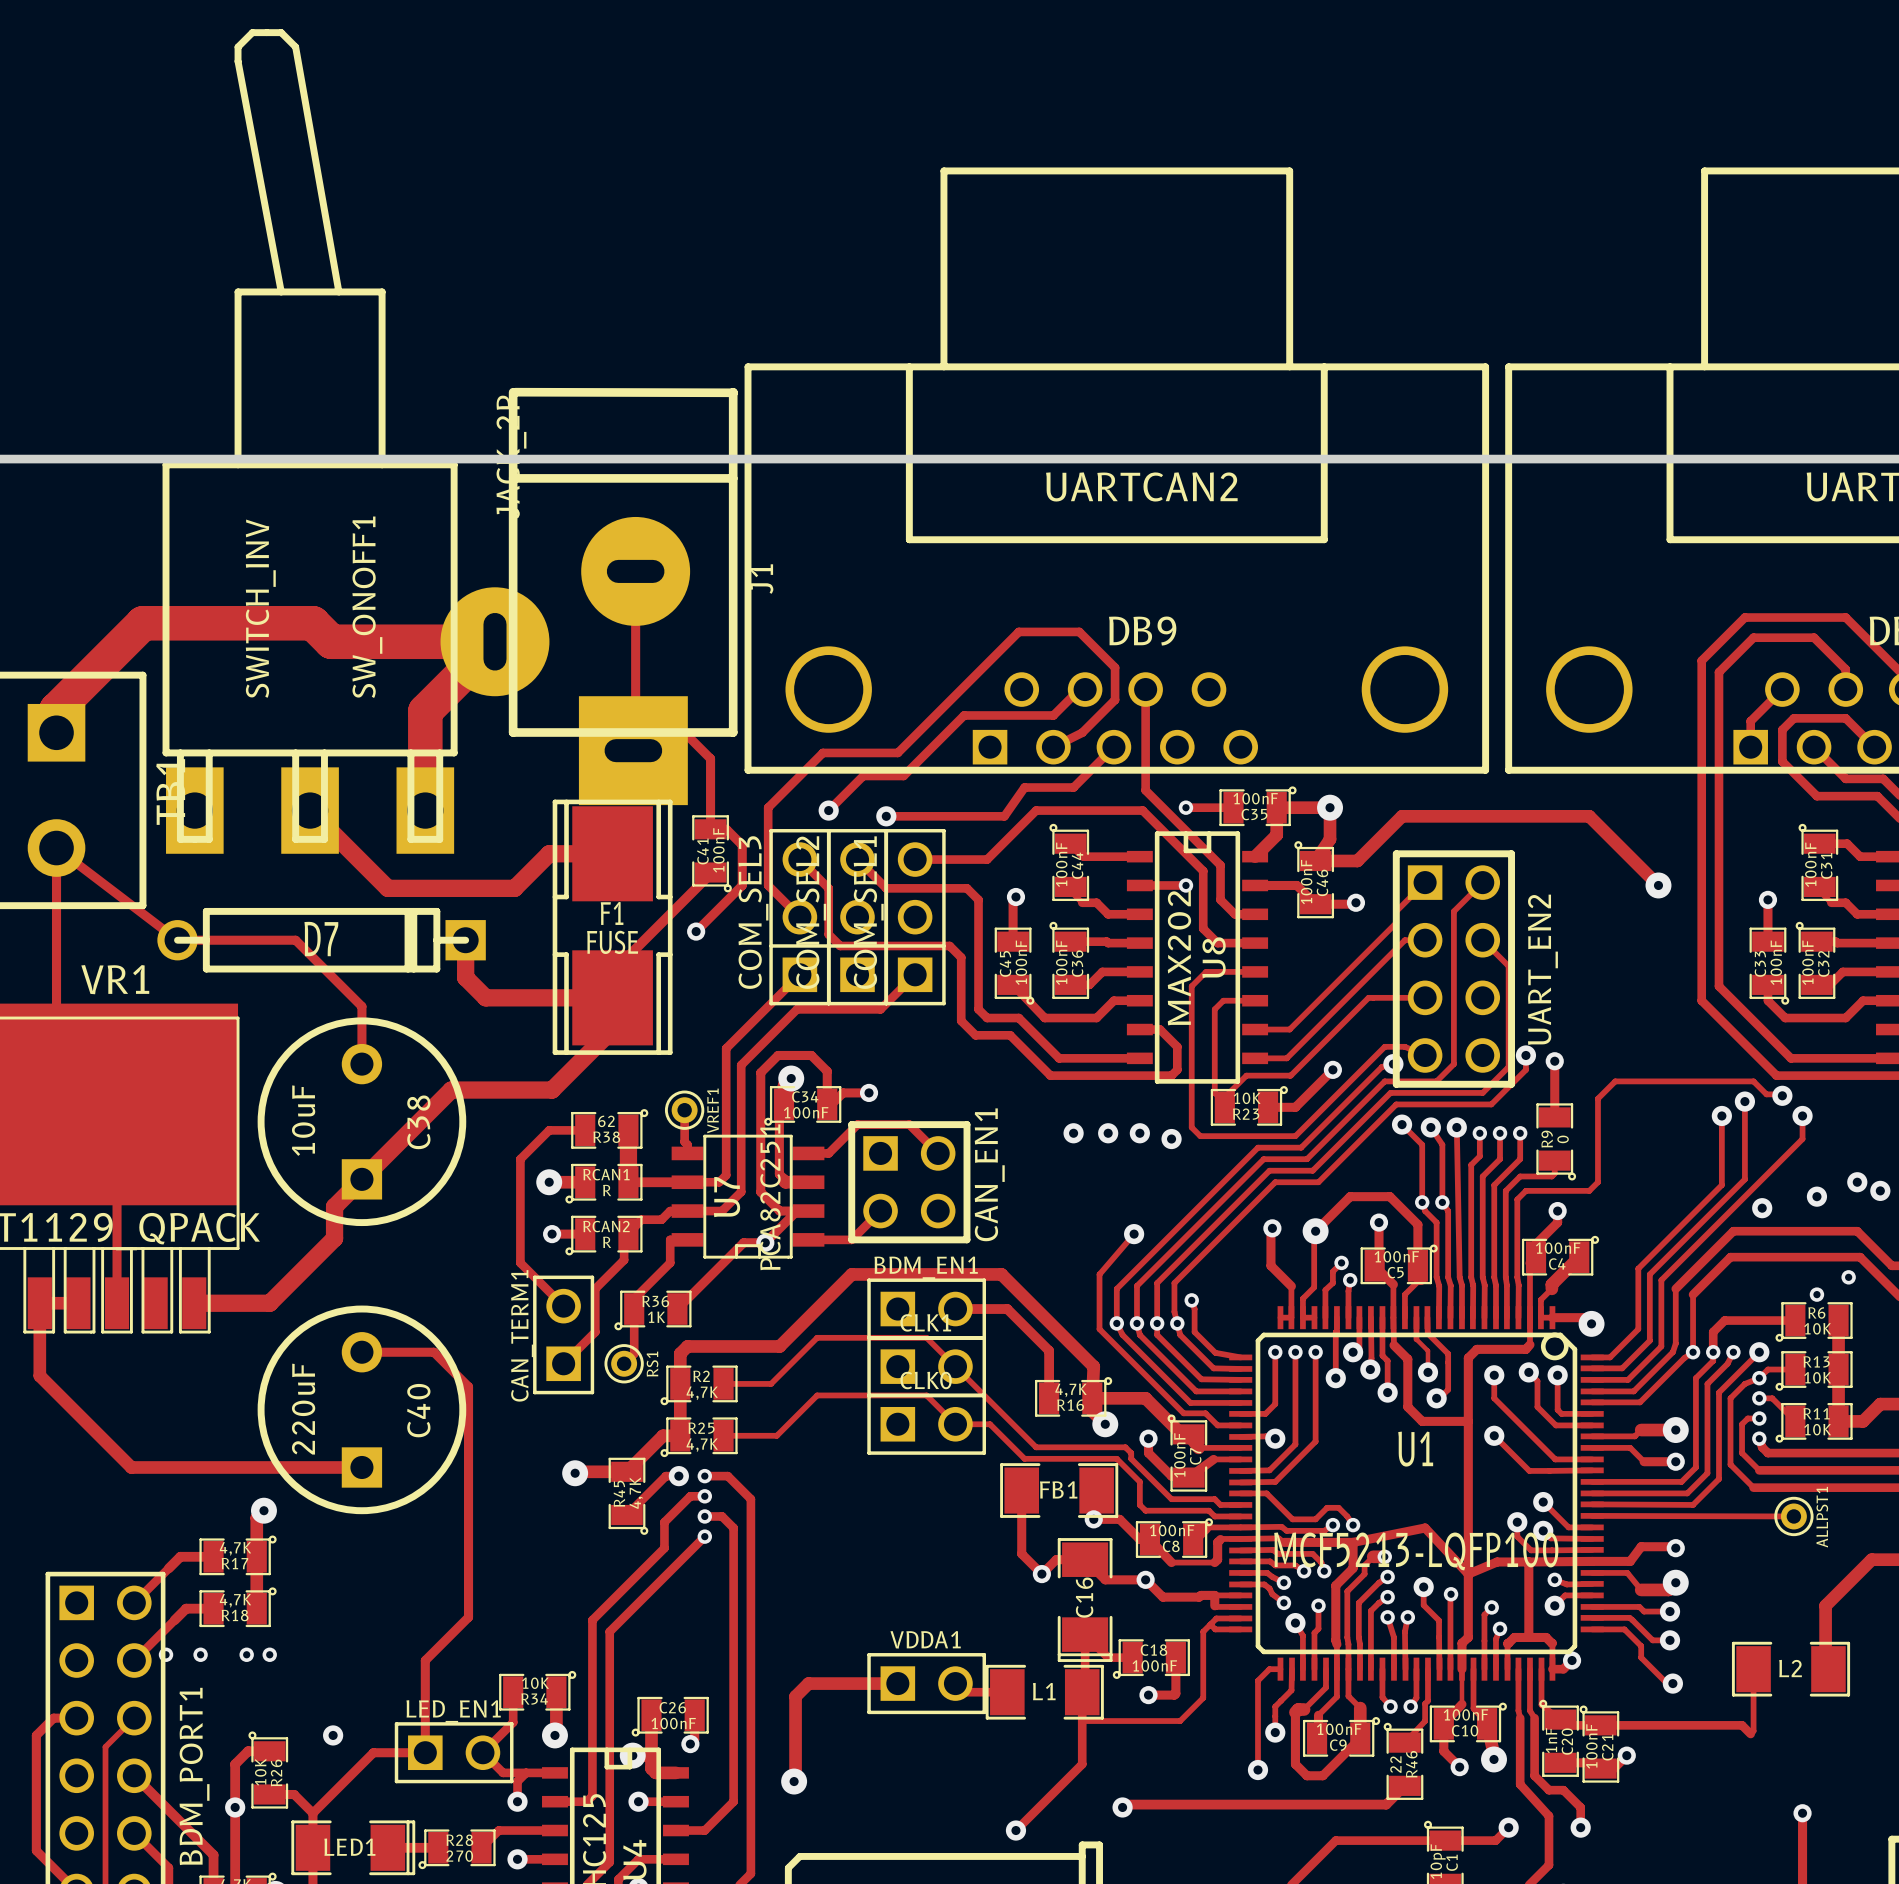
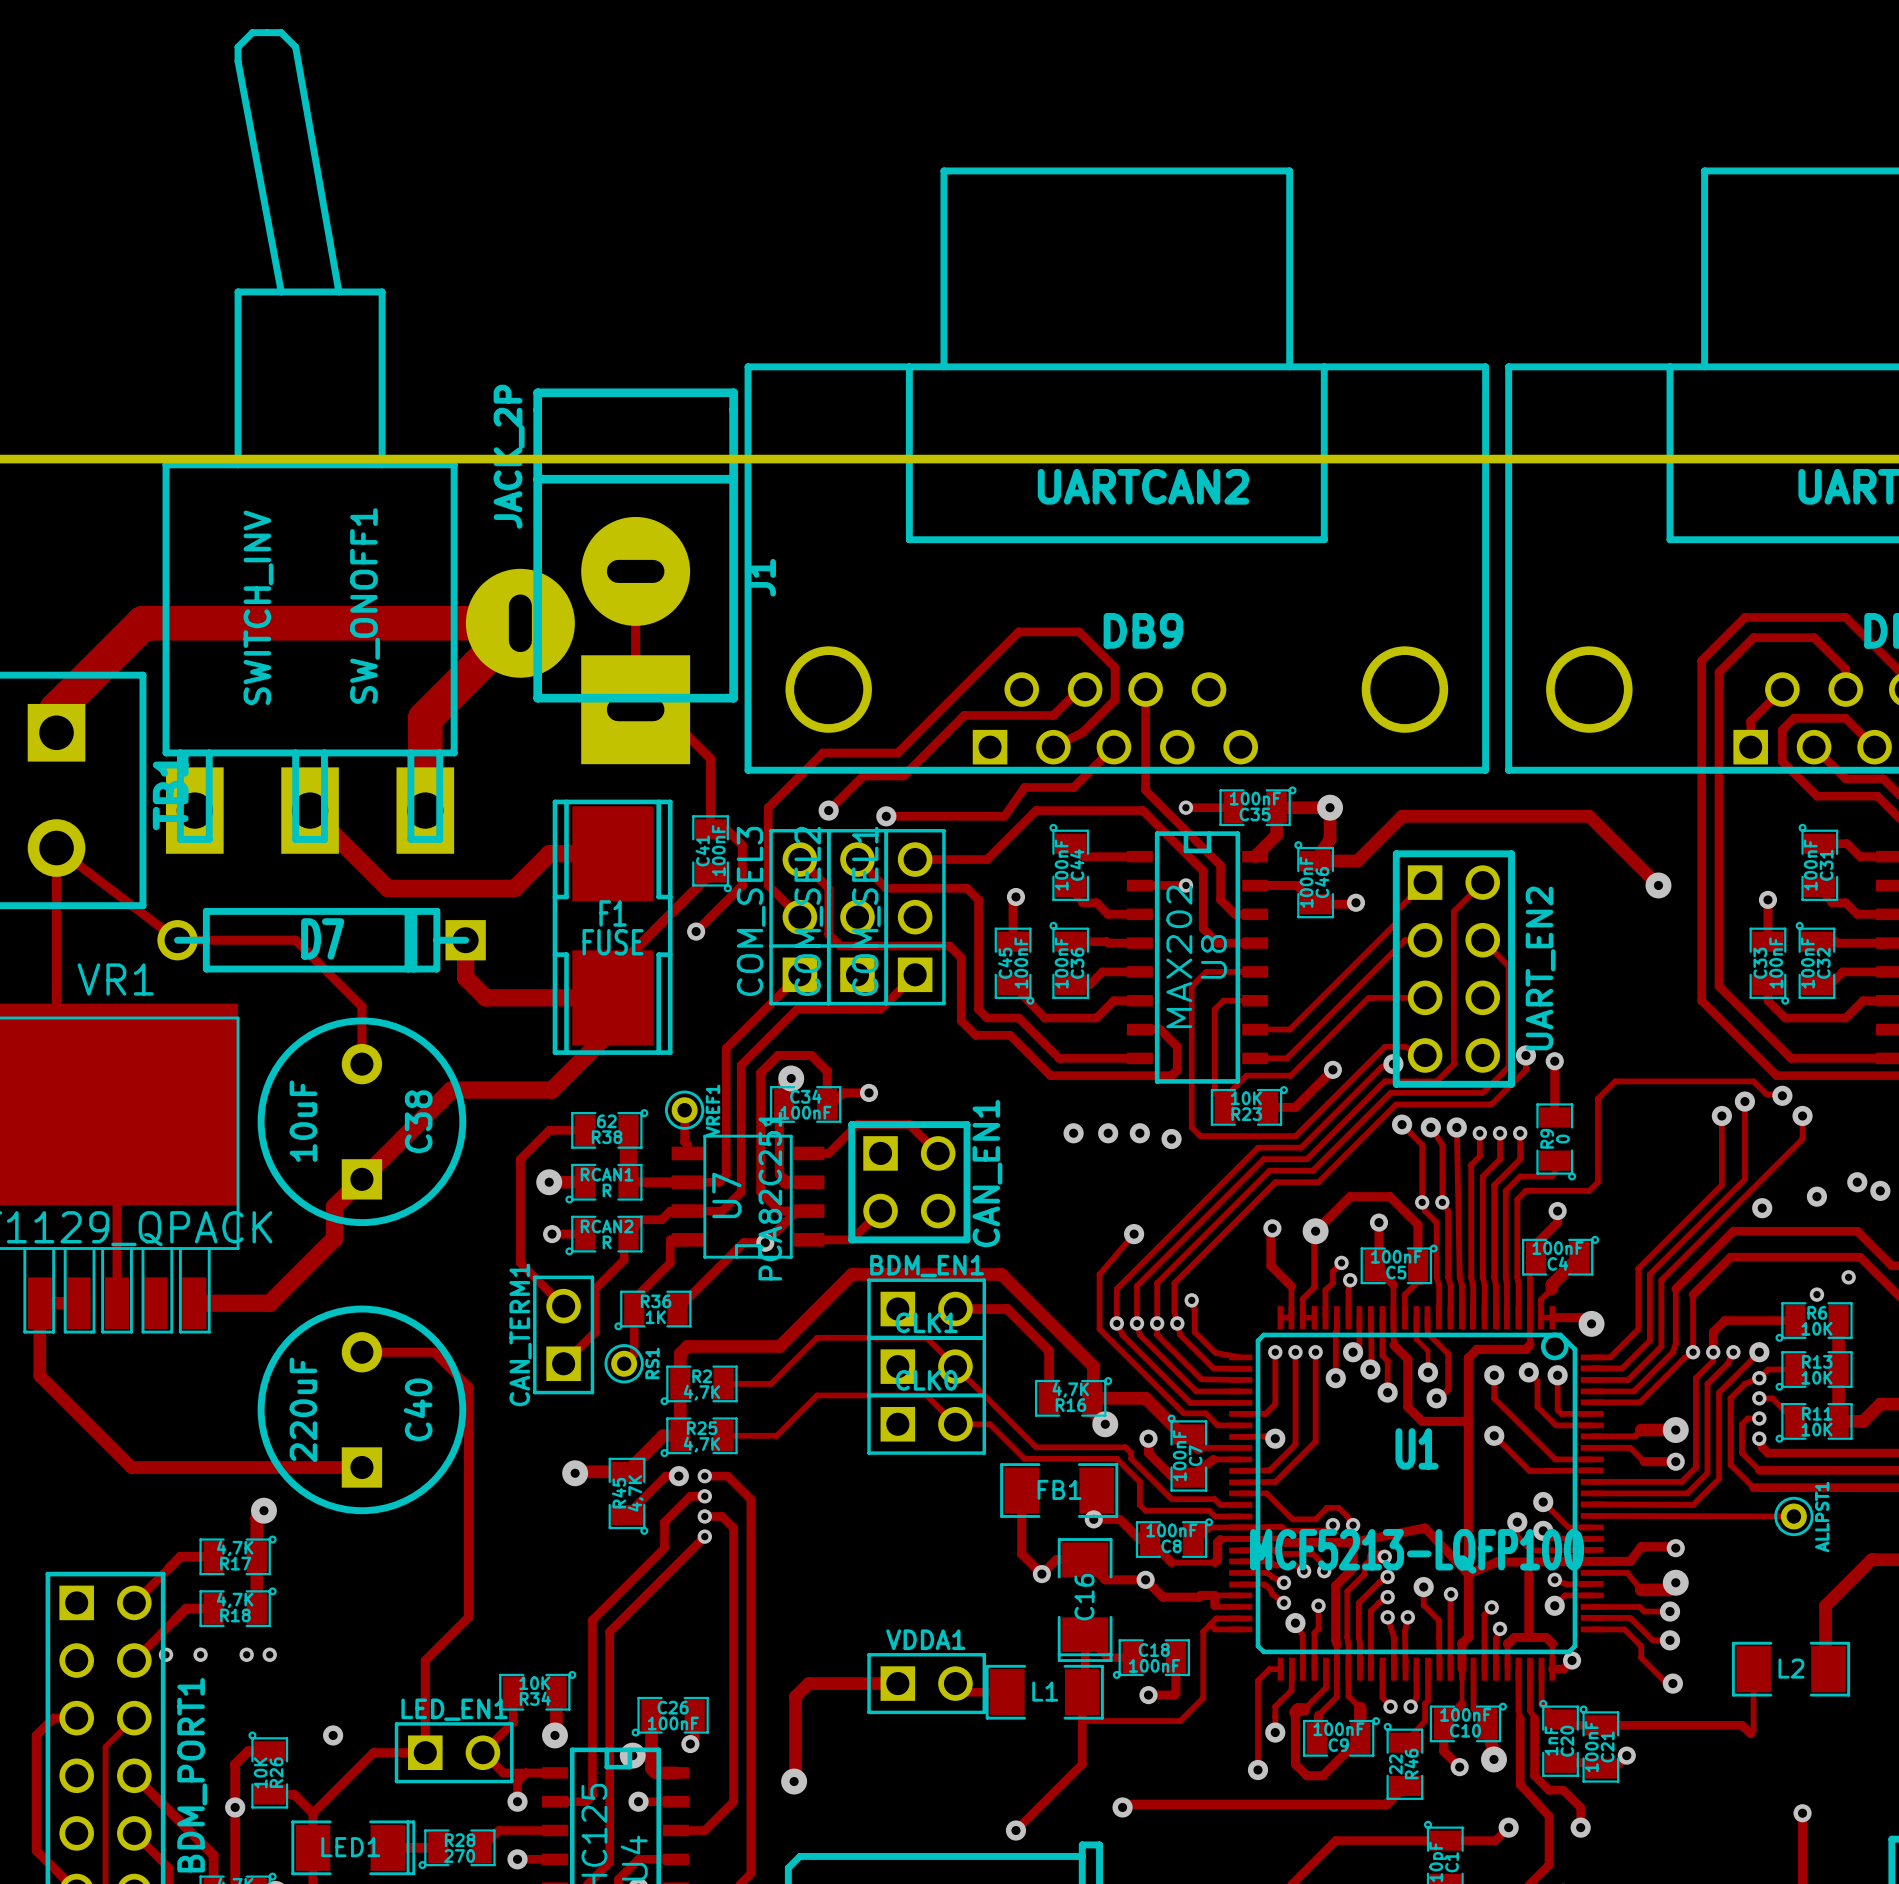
J1 footprint: [440, 387, 738, 806] -> [465, 388, 738, 765]
track: (312, 623) (331, 641) (494, 641) (425, 711) (425, 718) -> (312, 623) (520, 623) (425, 718)

